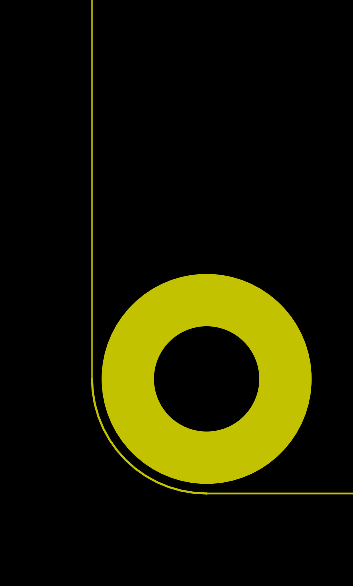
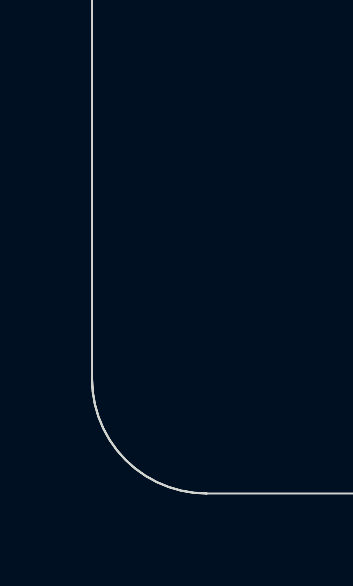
part: (206, 378) -> none

